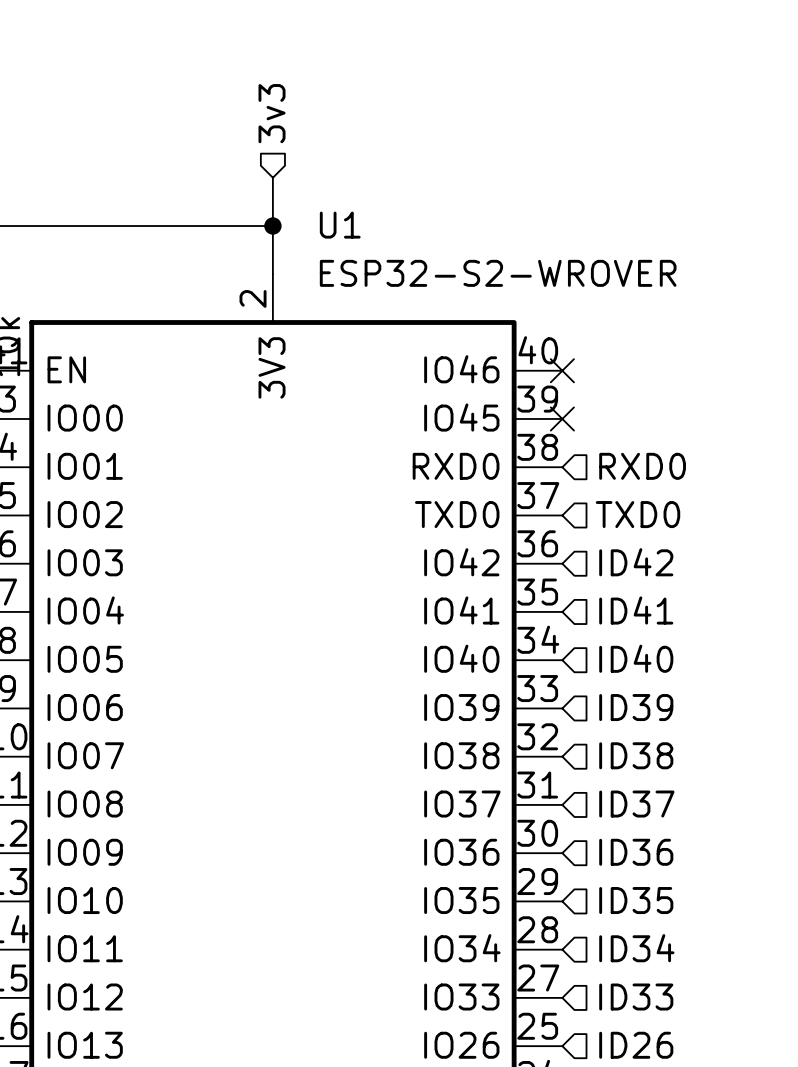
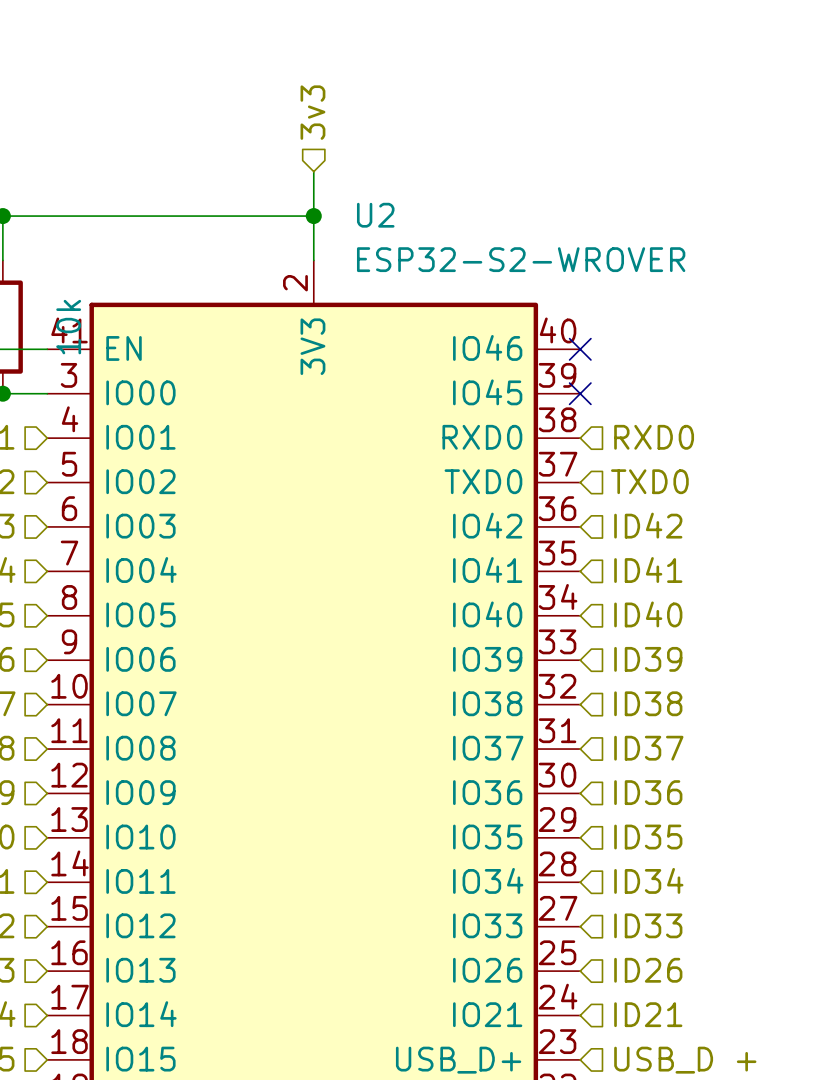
U1 name: U1 (340, 225) -> U2 (375, 215)

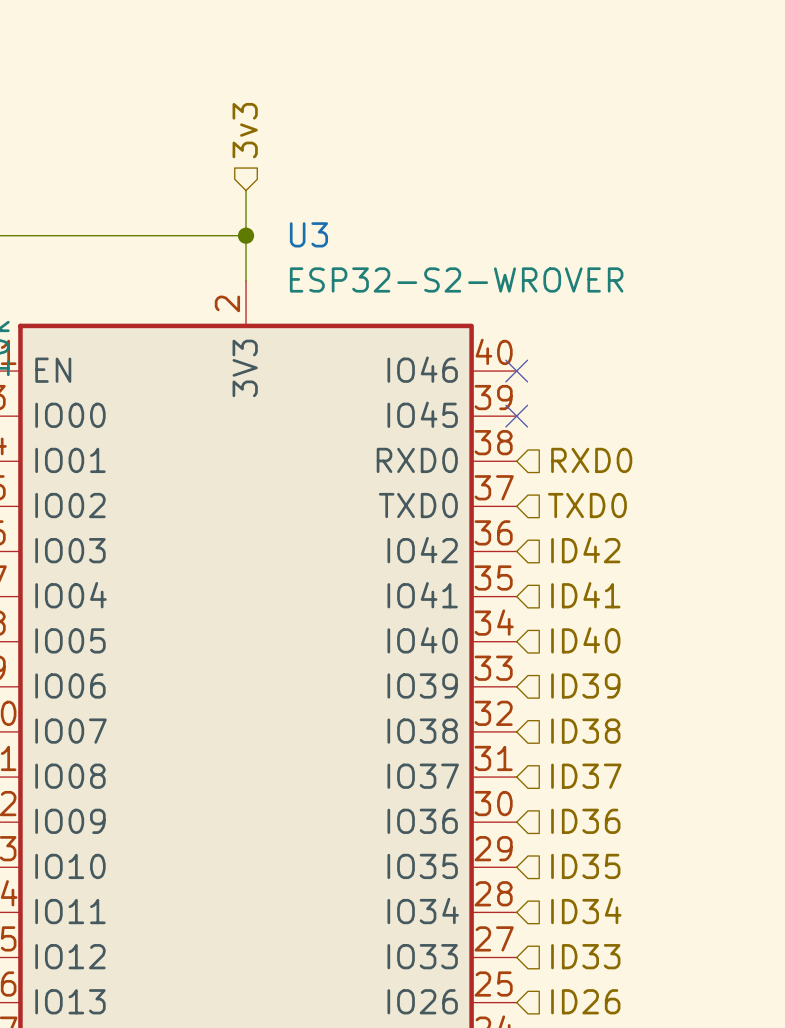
U2 name: U2 (375, 215) -> U3 (308, 234)

